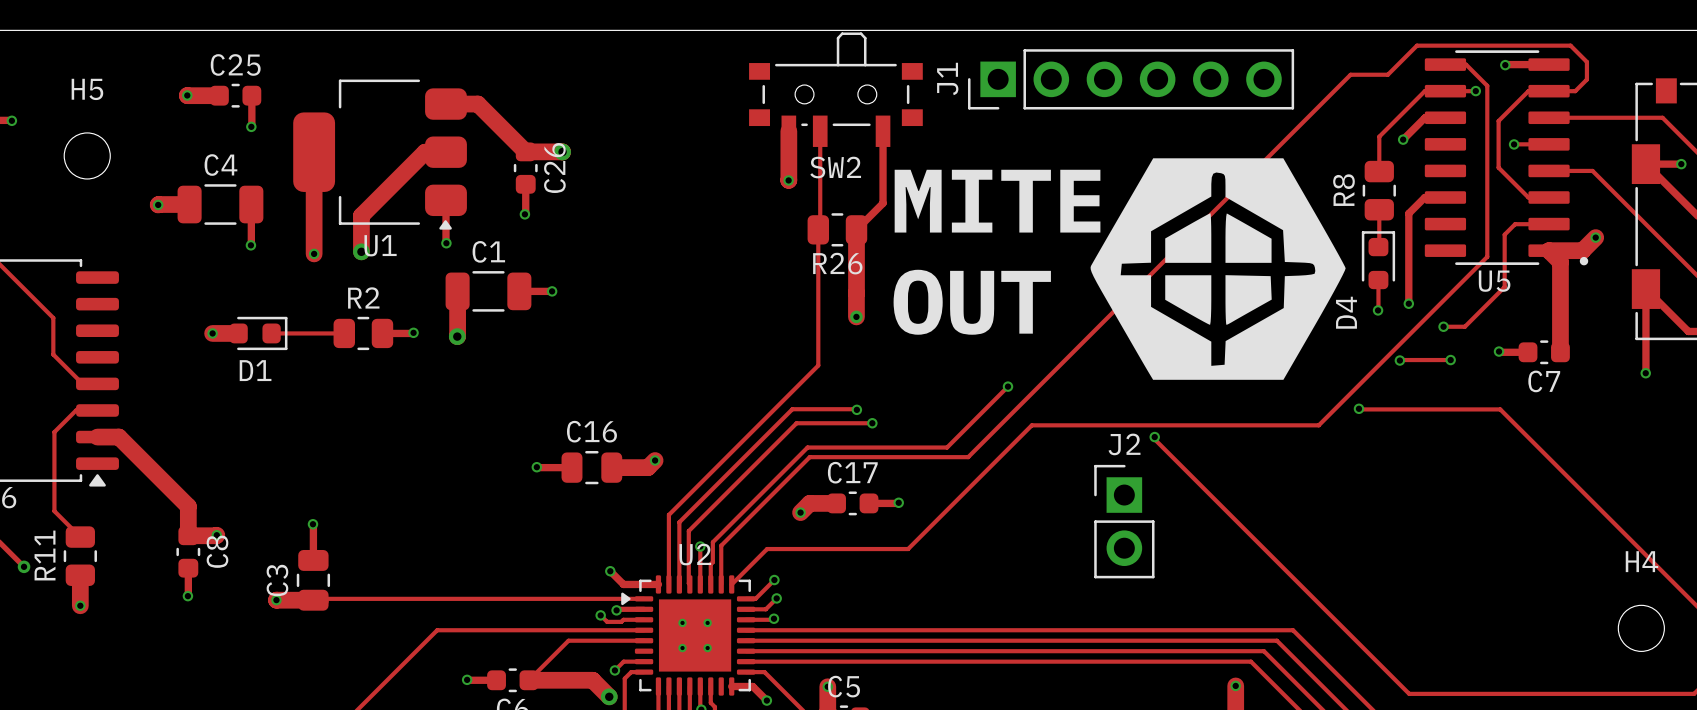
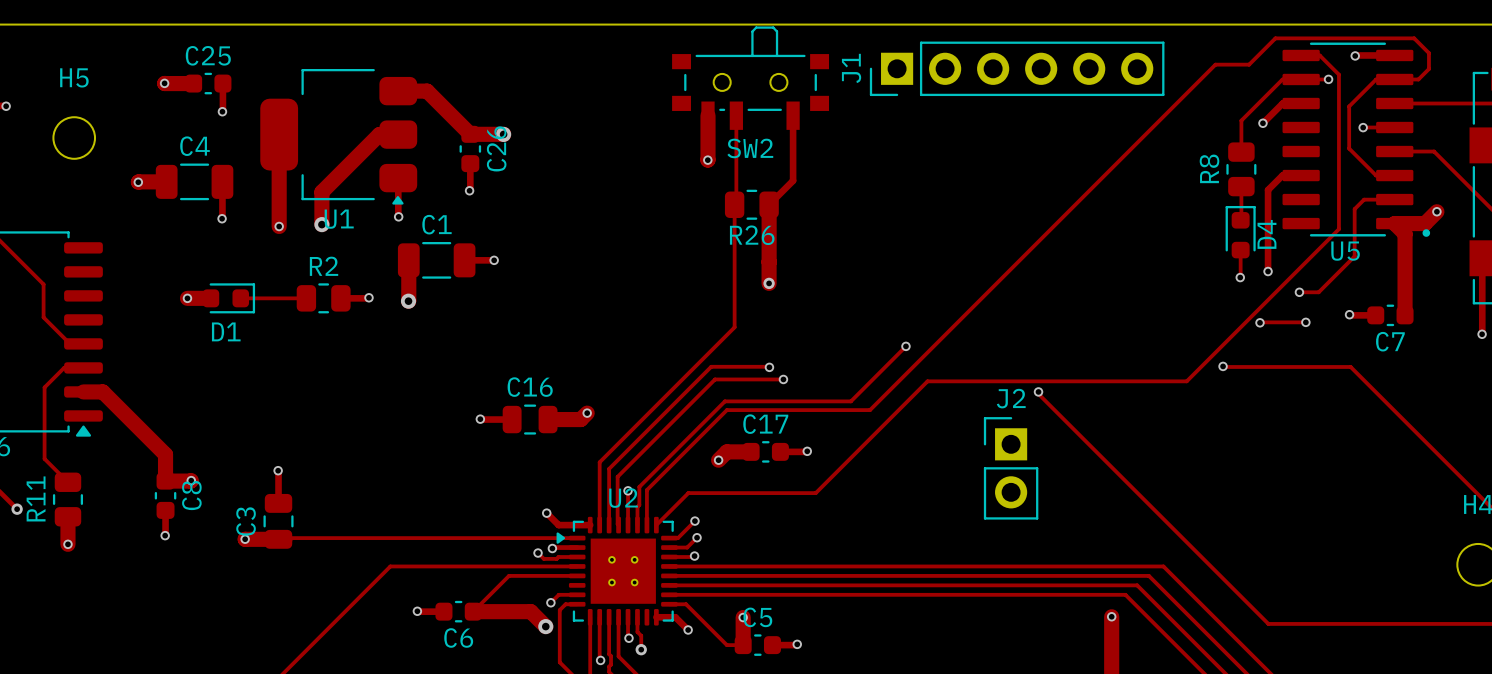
drawing: [1090, 158, 1346, 380] -> none
text: MITE (997, 201) -> none
text: OUT (972, 302) -> none
D4 name position: D4 (1346, 312) -> D4 (1266, 234)

